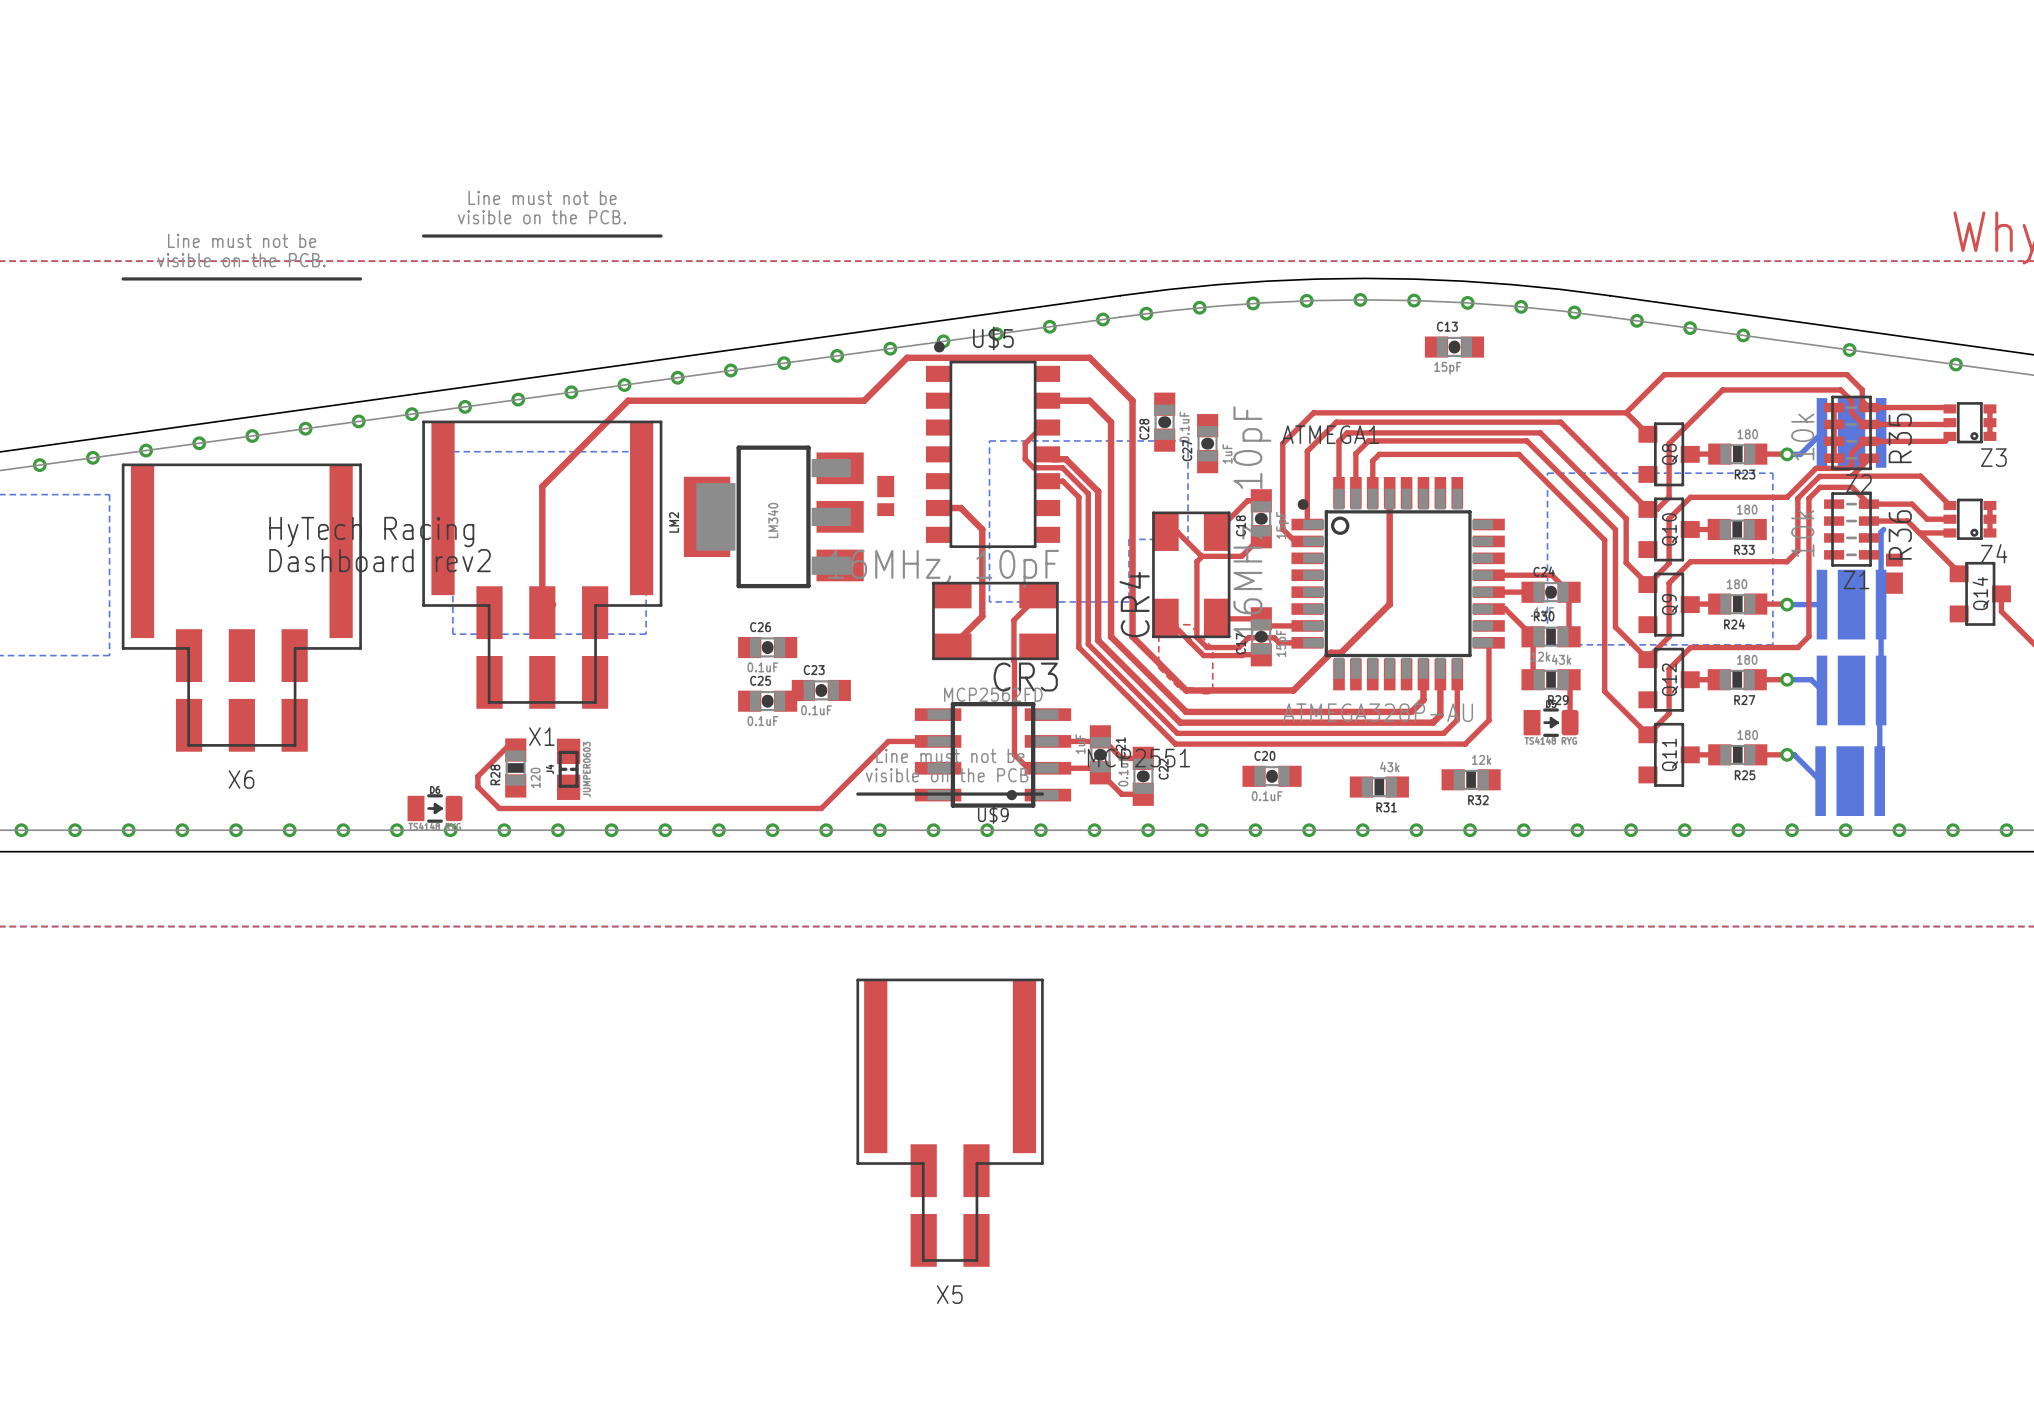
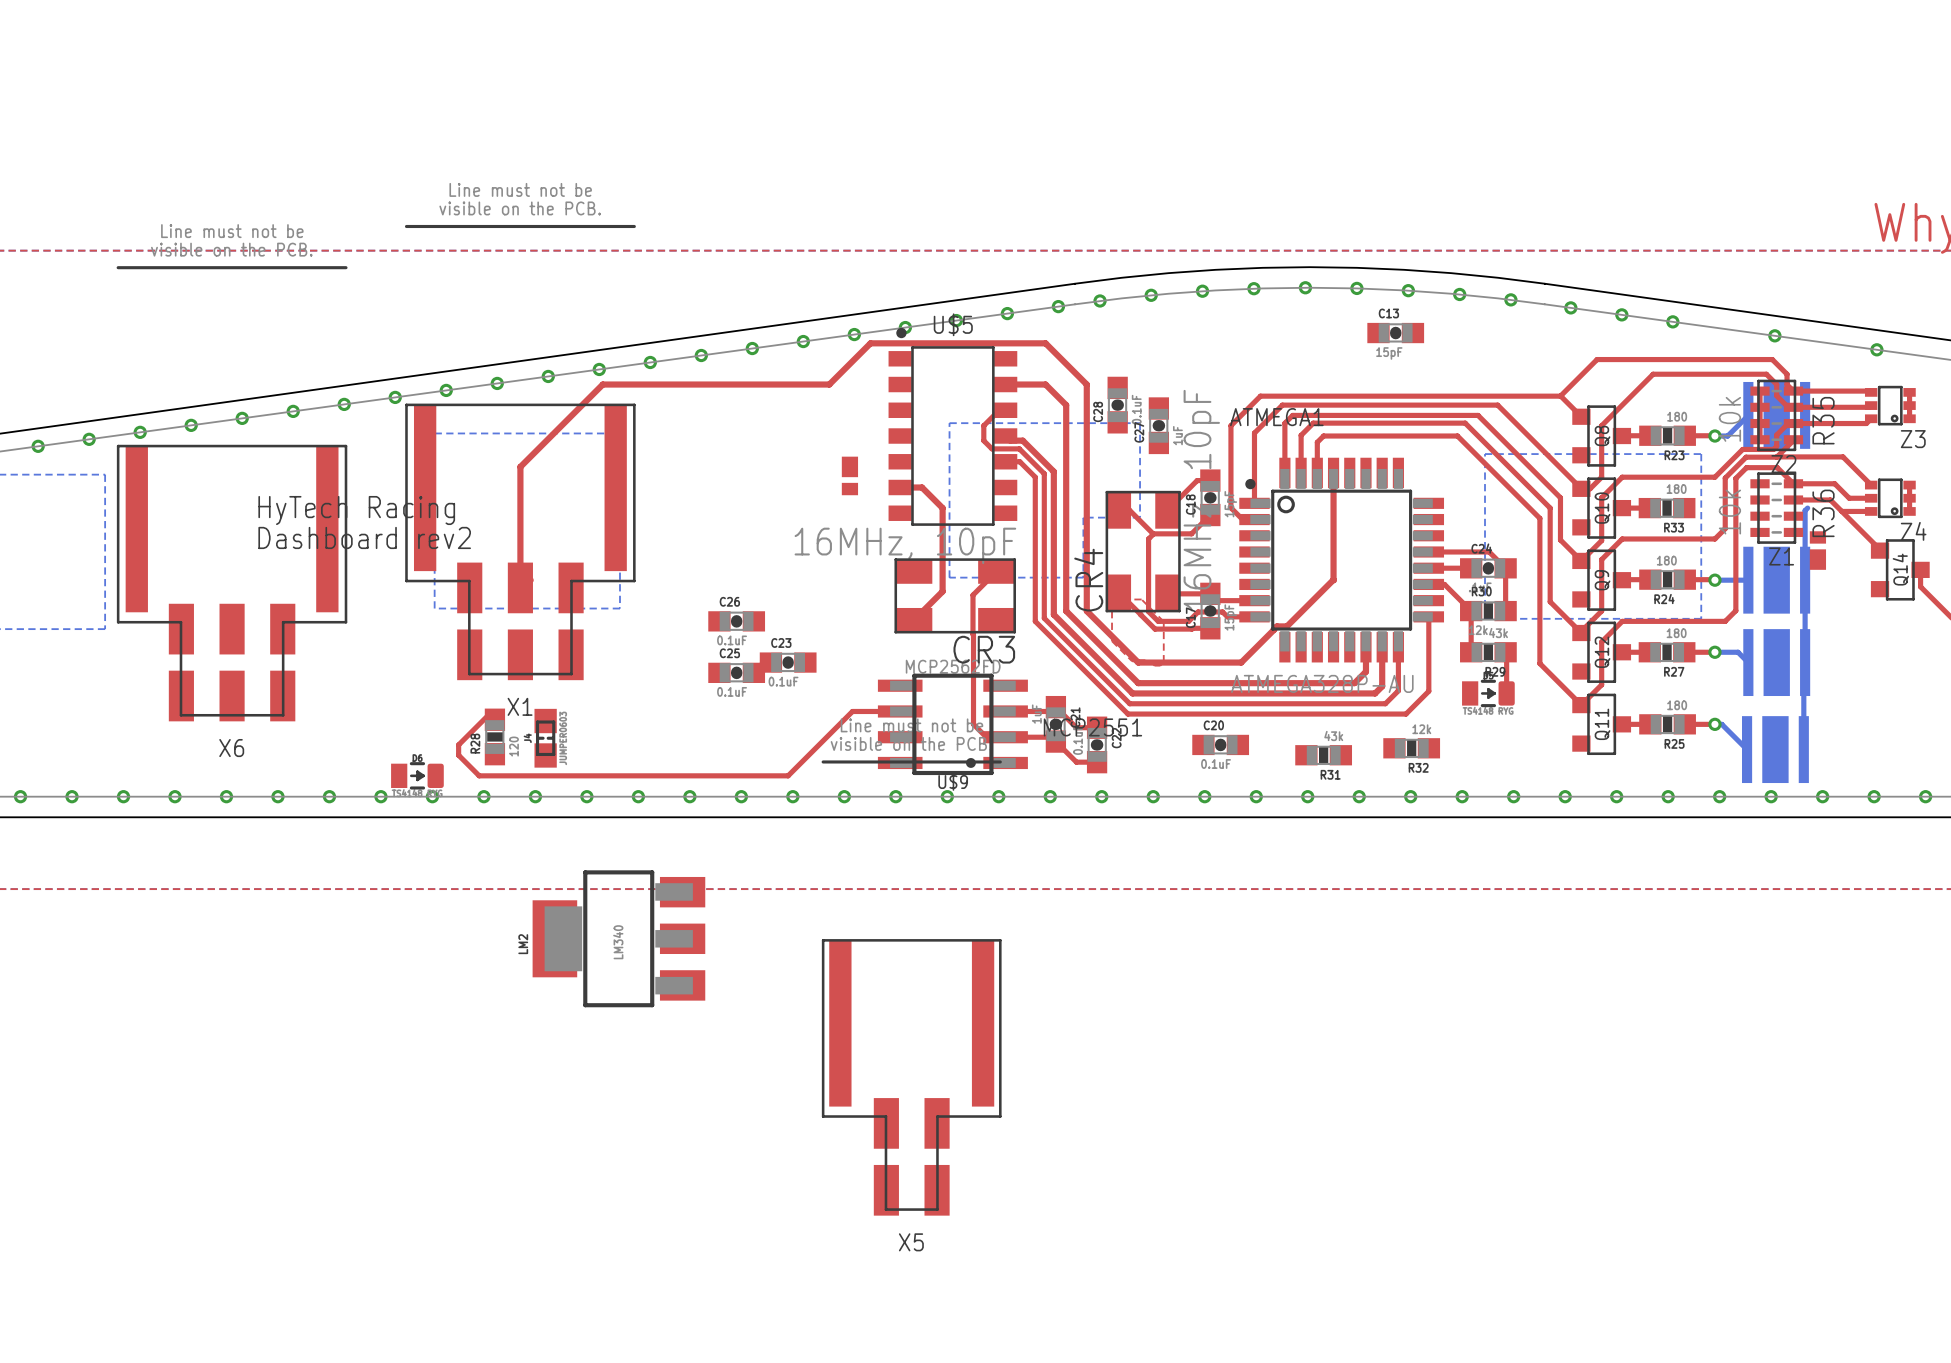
LM2 position: (773, 516) -> (618, 938)

